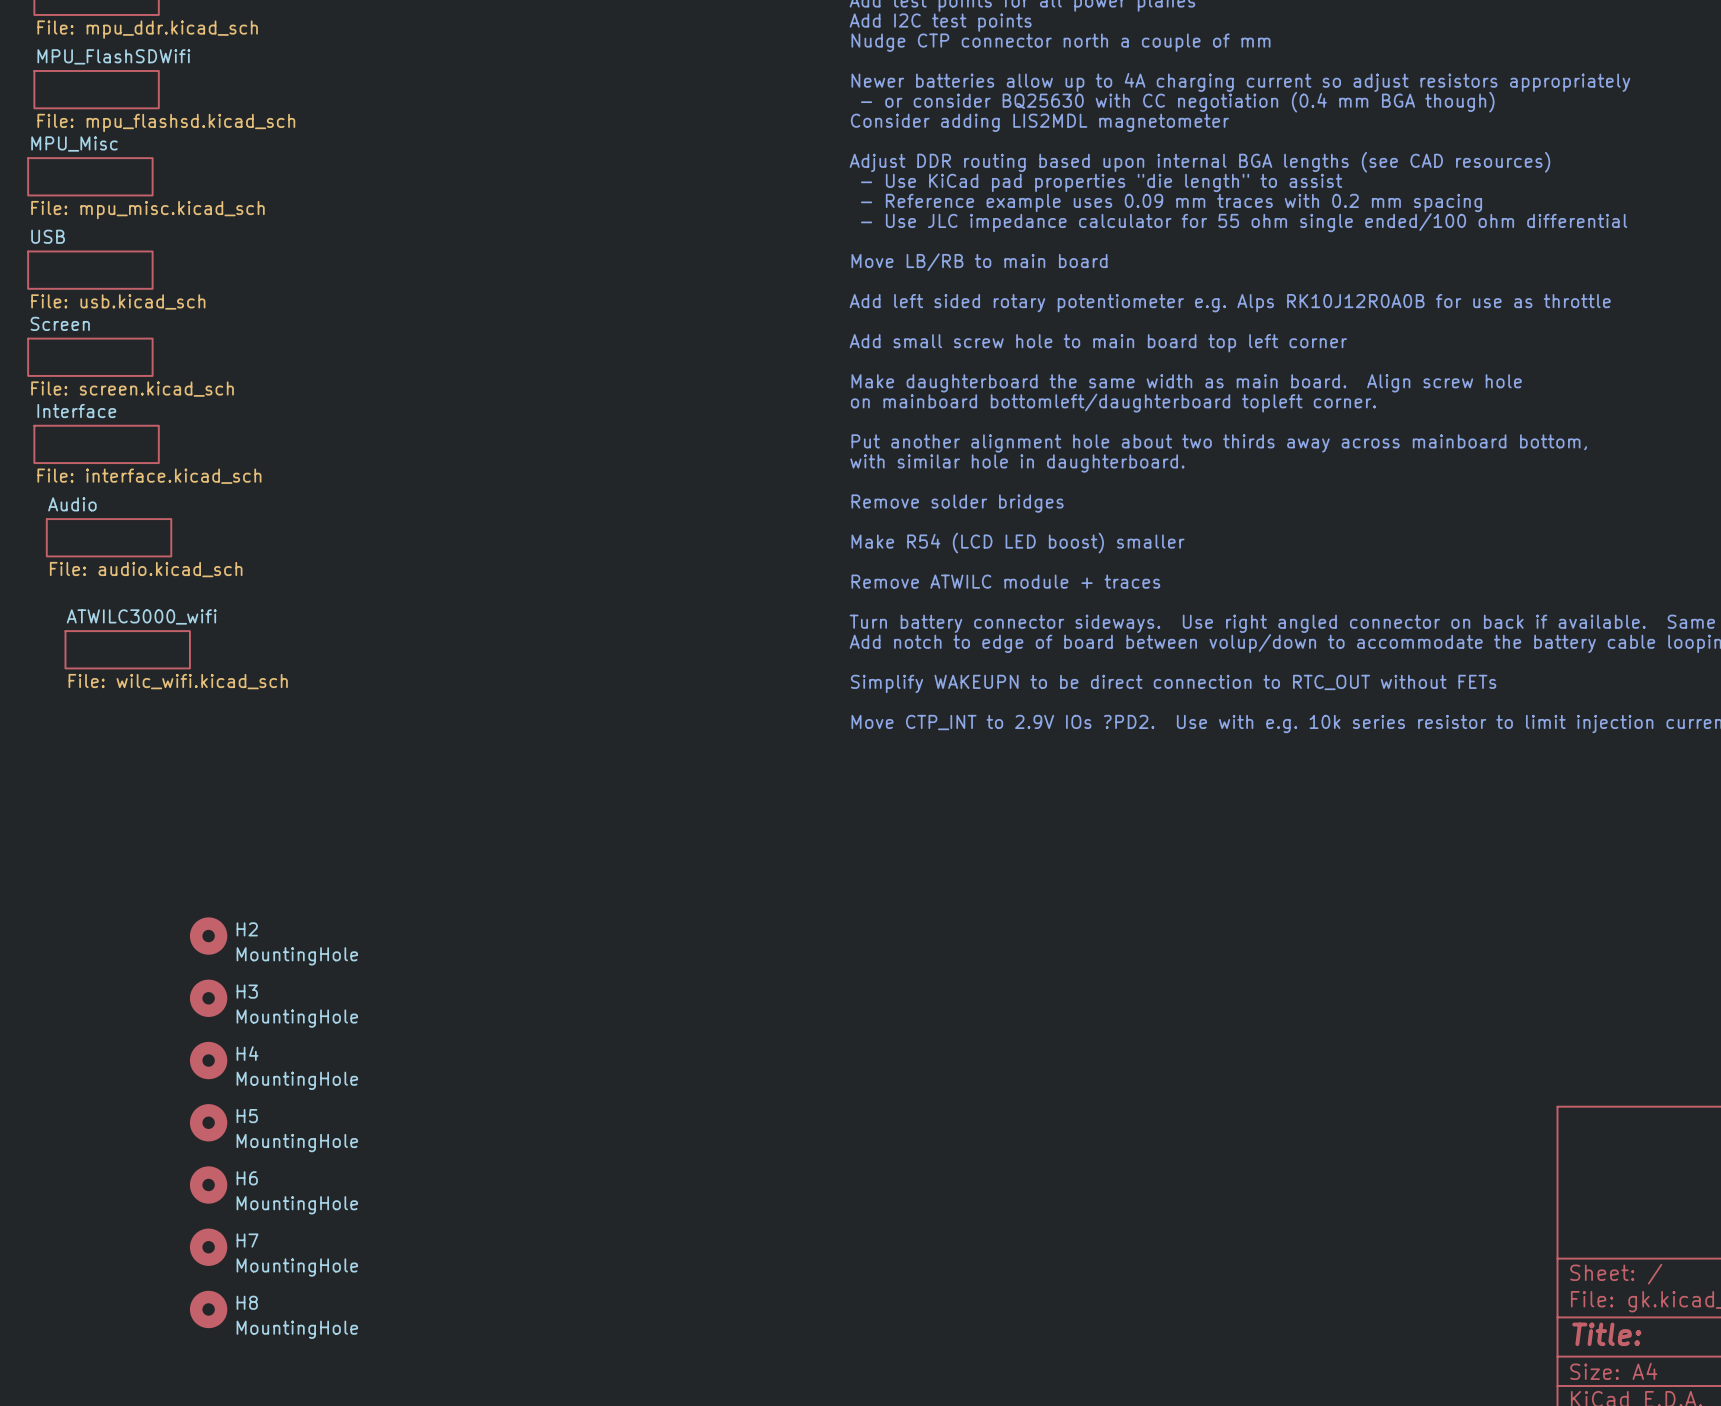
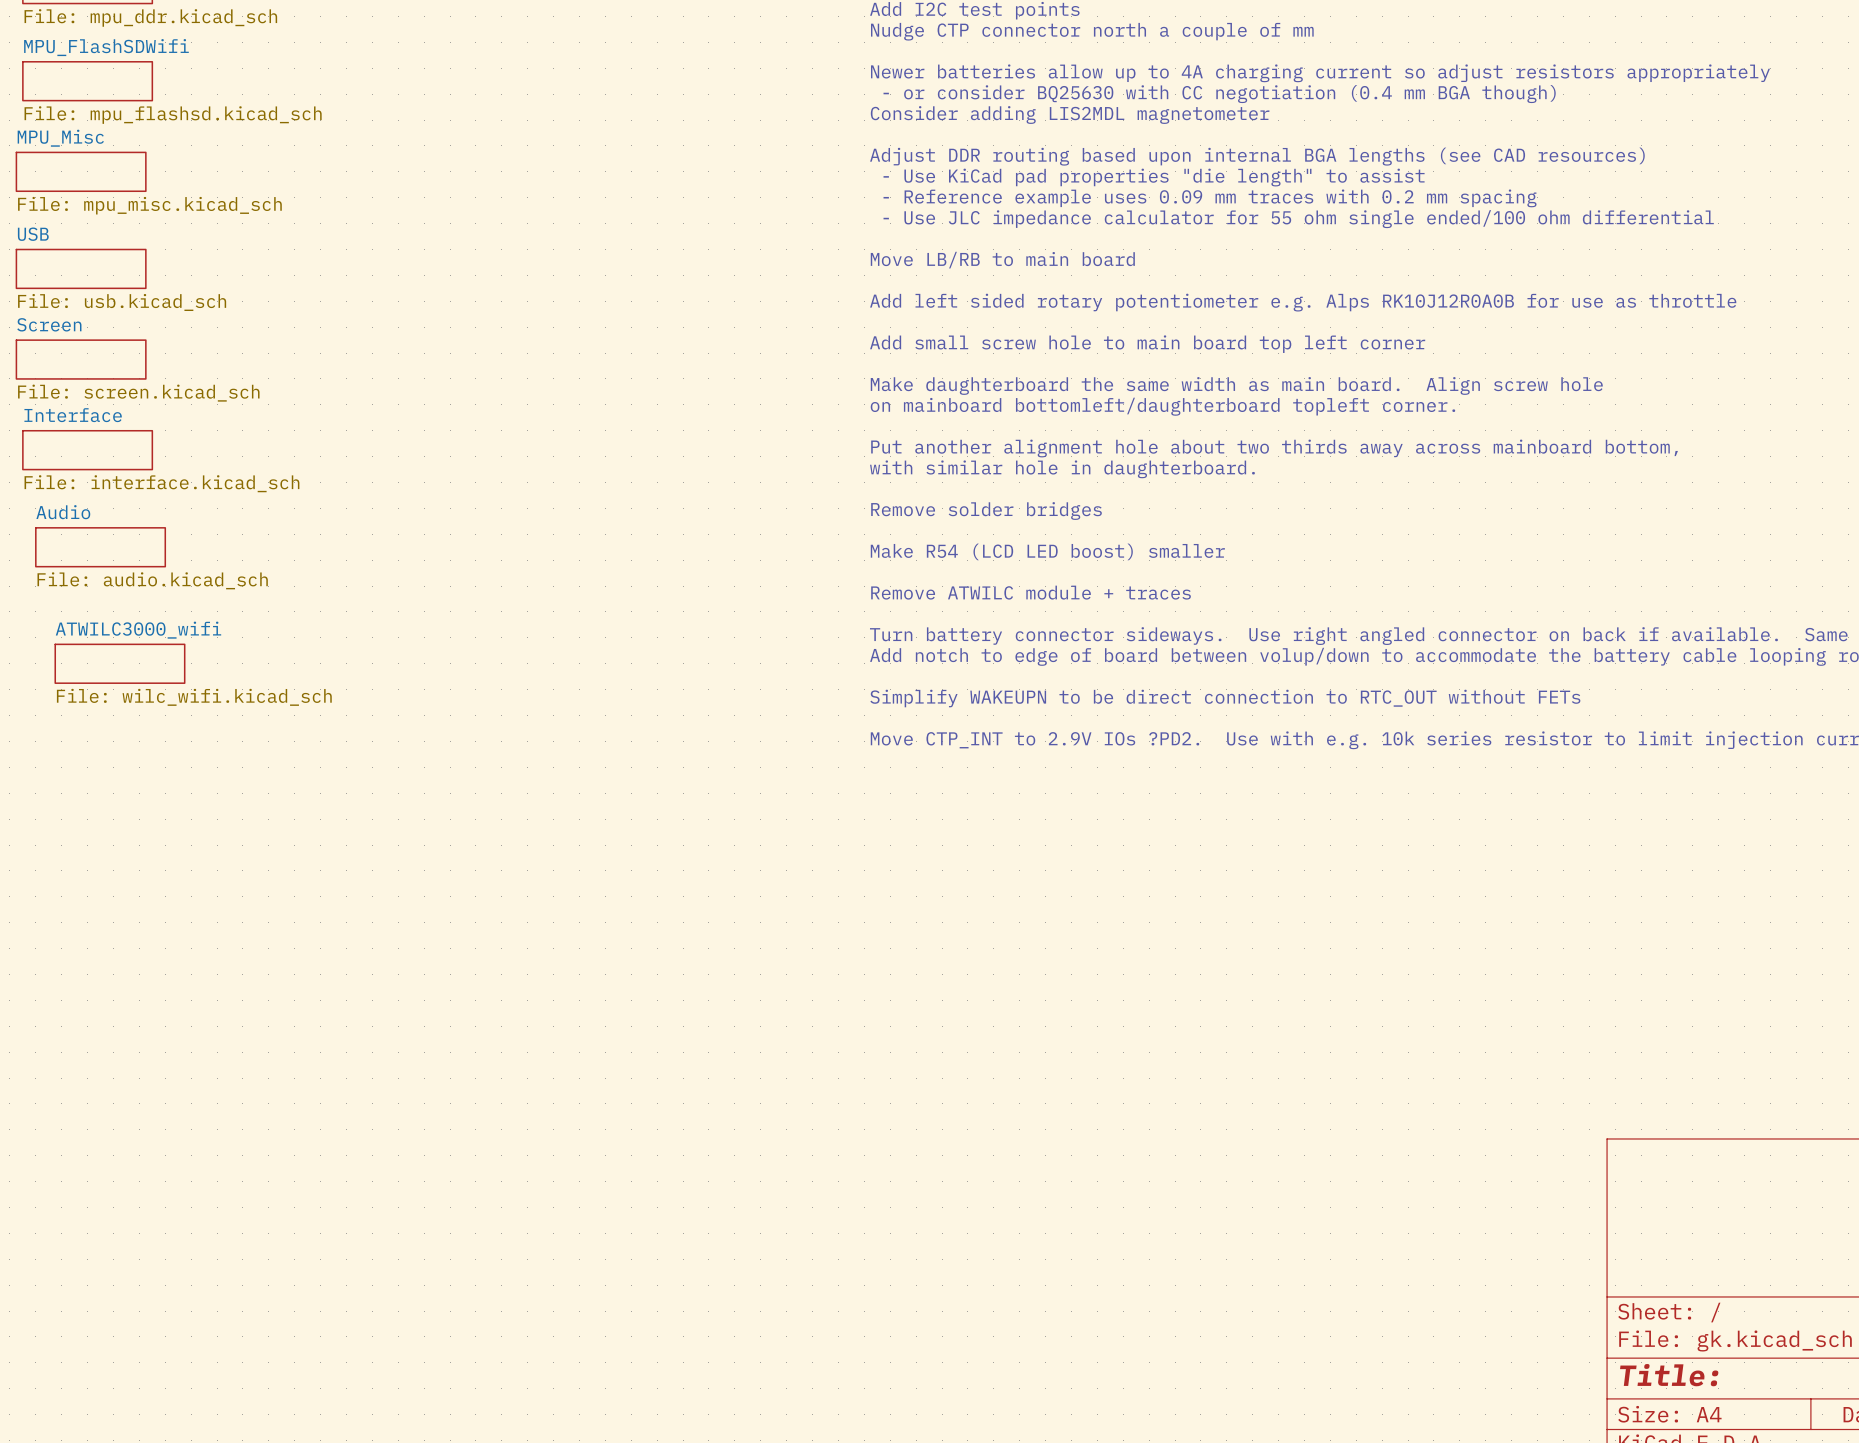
H2: MountingHole (208, 936) -> none
H3: MountingHole (208, 998) -> none
H4: MountingHole (208, 1060) -> none
H5: MountingHole (208, 1122) -> none
H6: MountingHole (208, 1185) -> none
H7: MountingHole (208, 1247) -> none
H8: MountingHole (208, 1309) -> none

